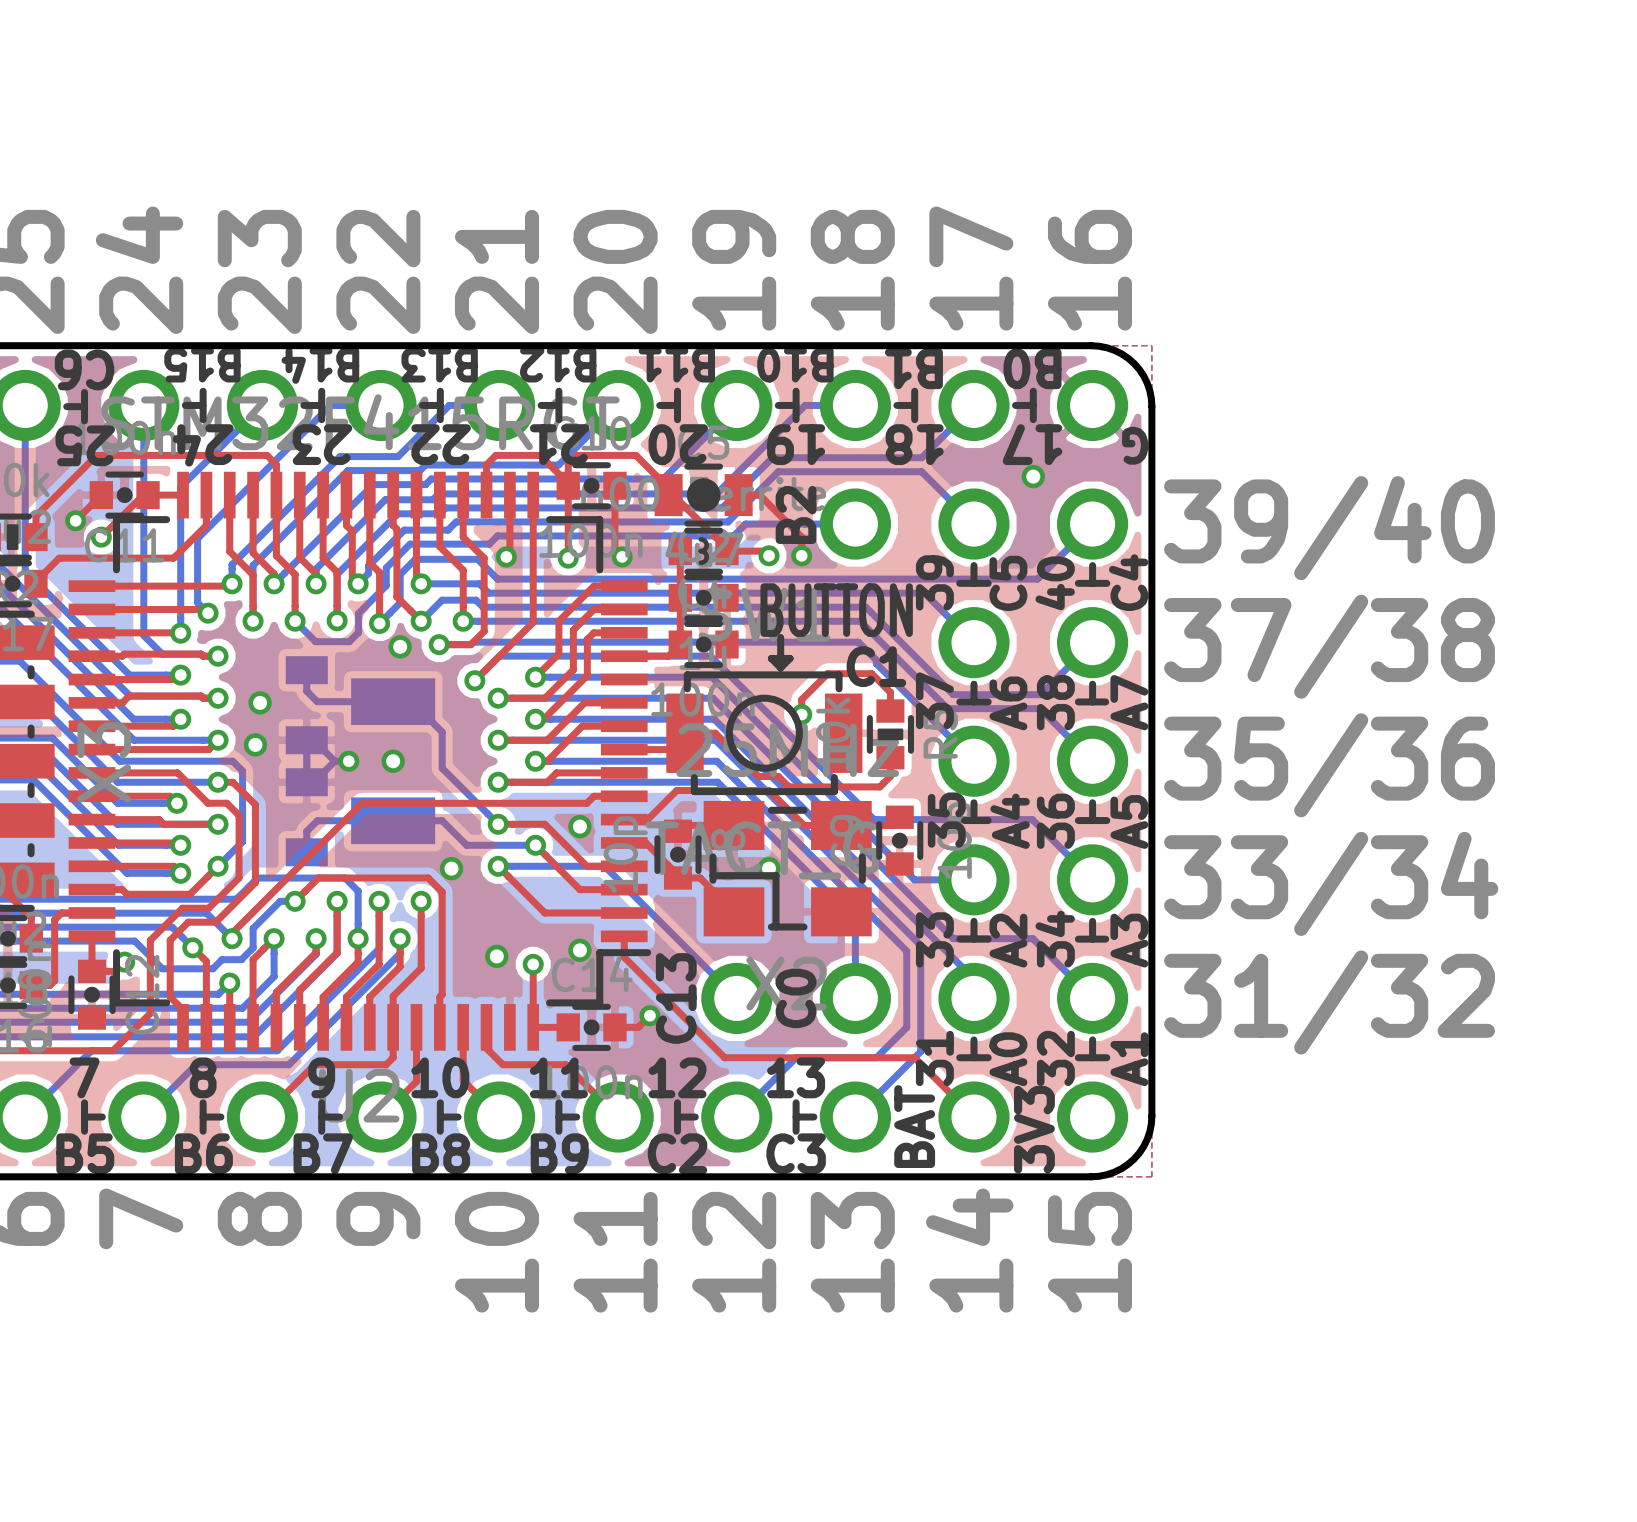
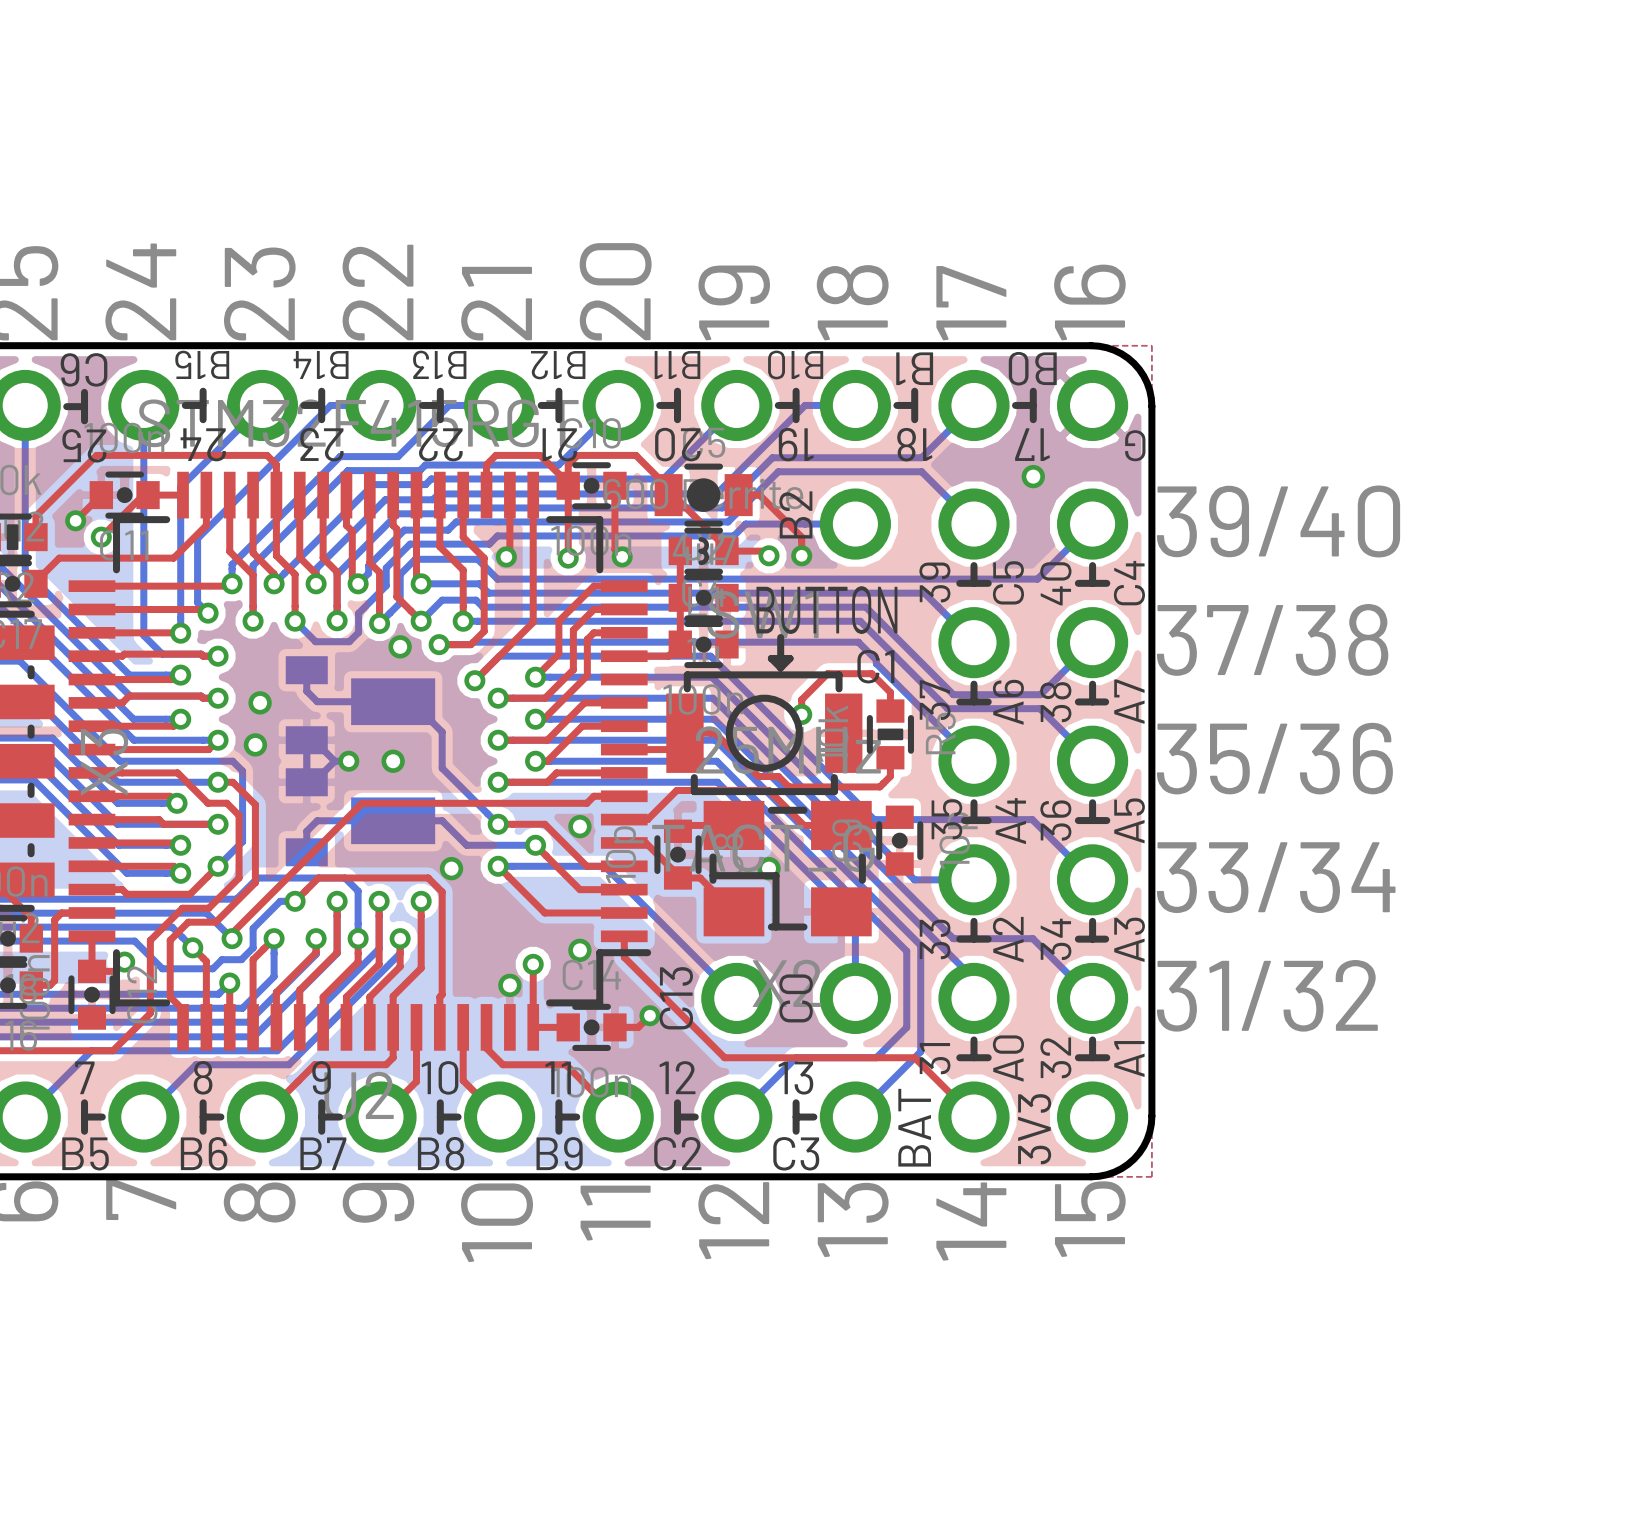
part position: (496, 956) -> (509, 985)

